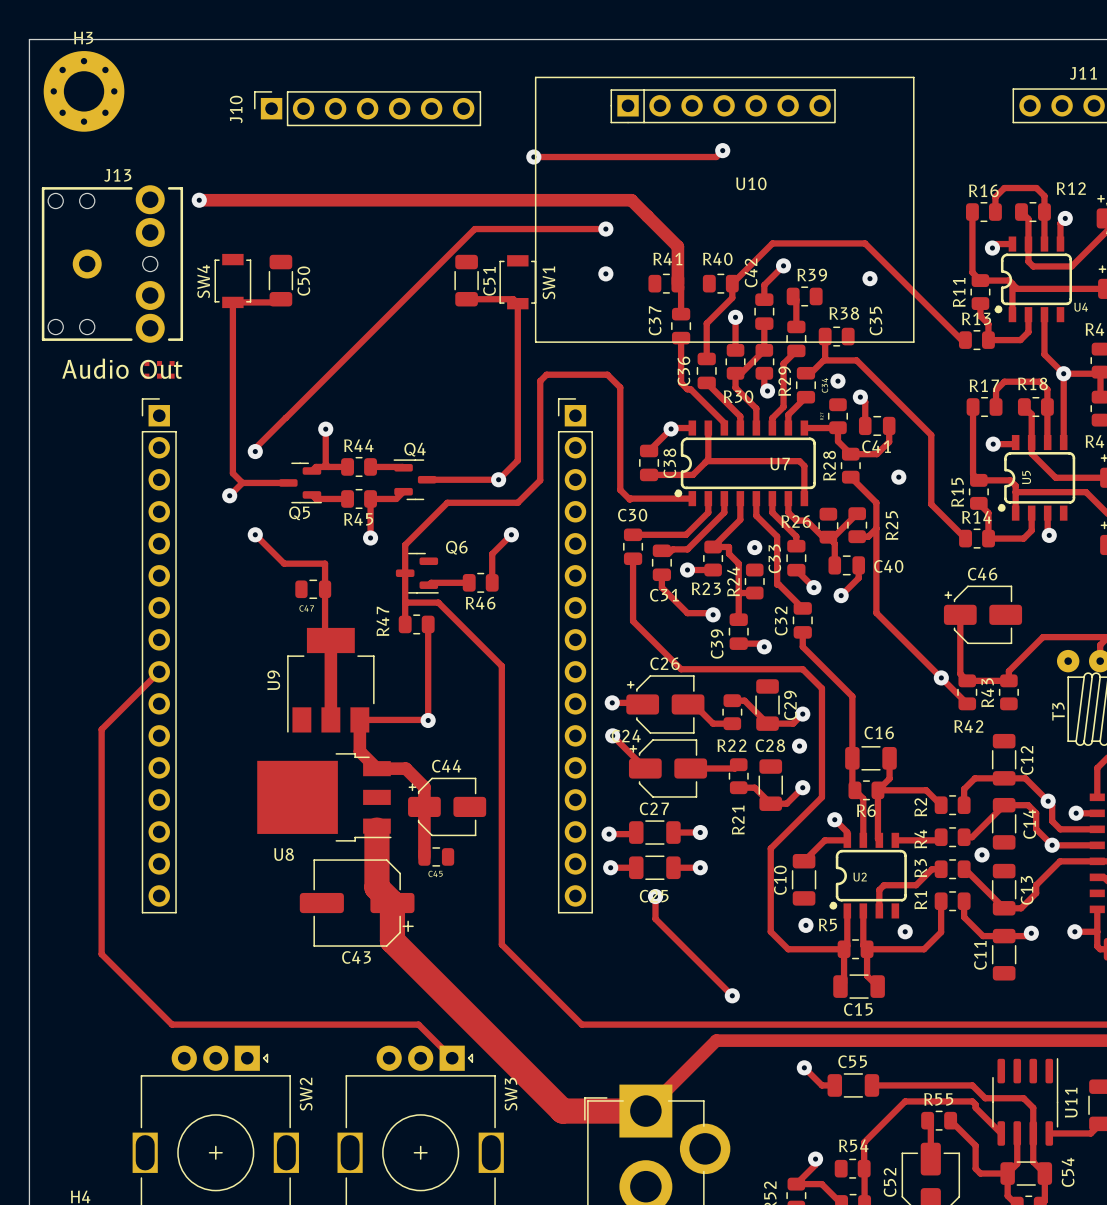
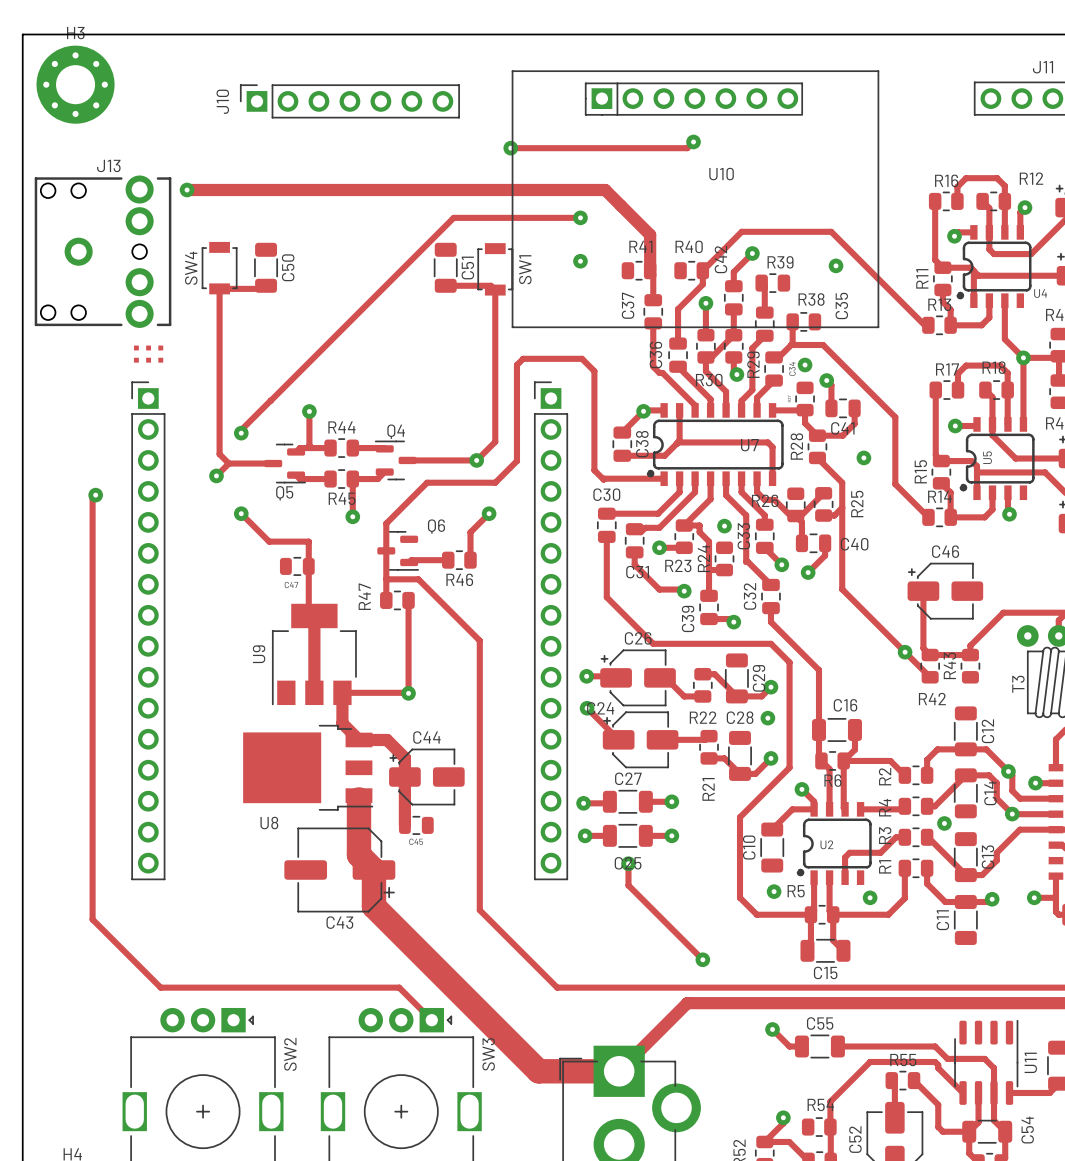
text: Audio Out (122, 368) -> none
via: none -> (95, 495)
track: (159, 671) (101, 729) -> (95, 495) (92, 498) (92, 702)

